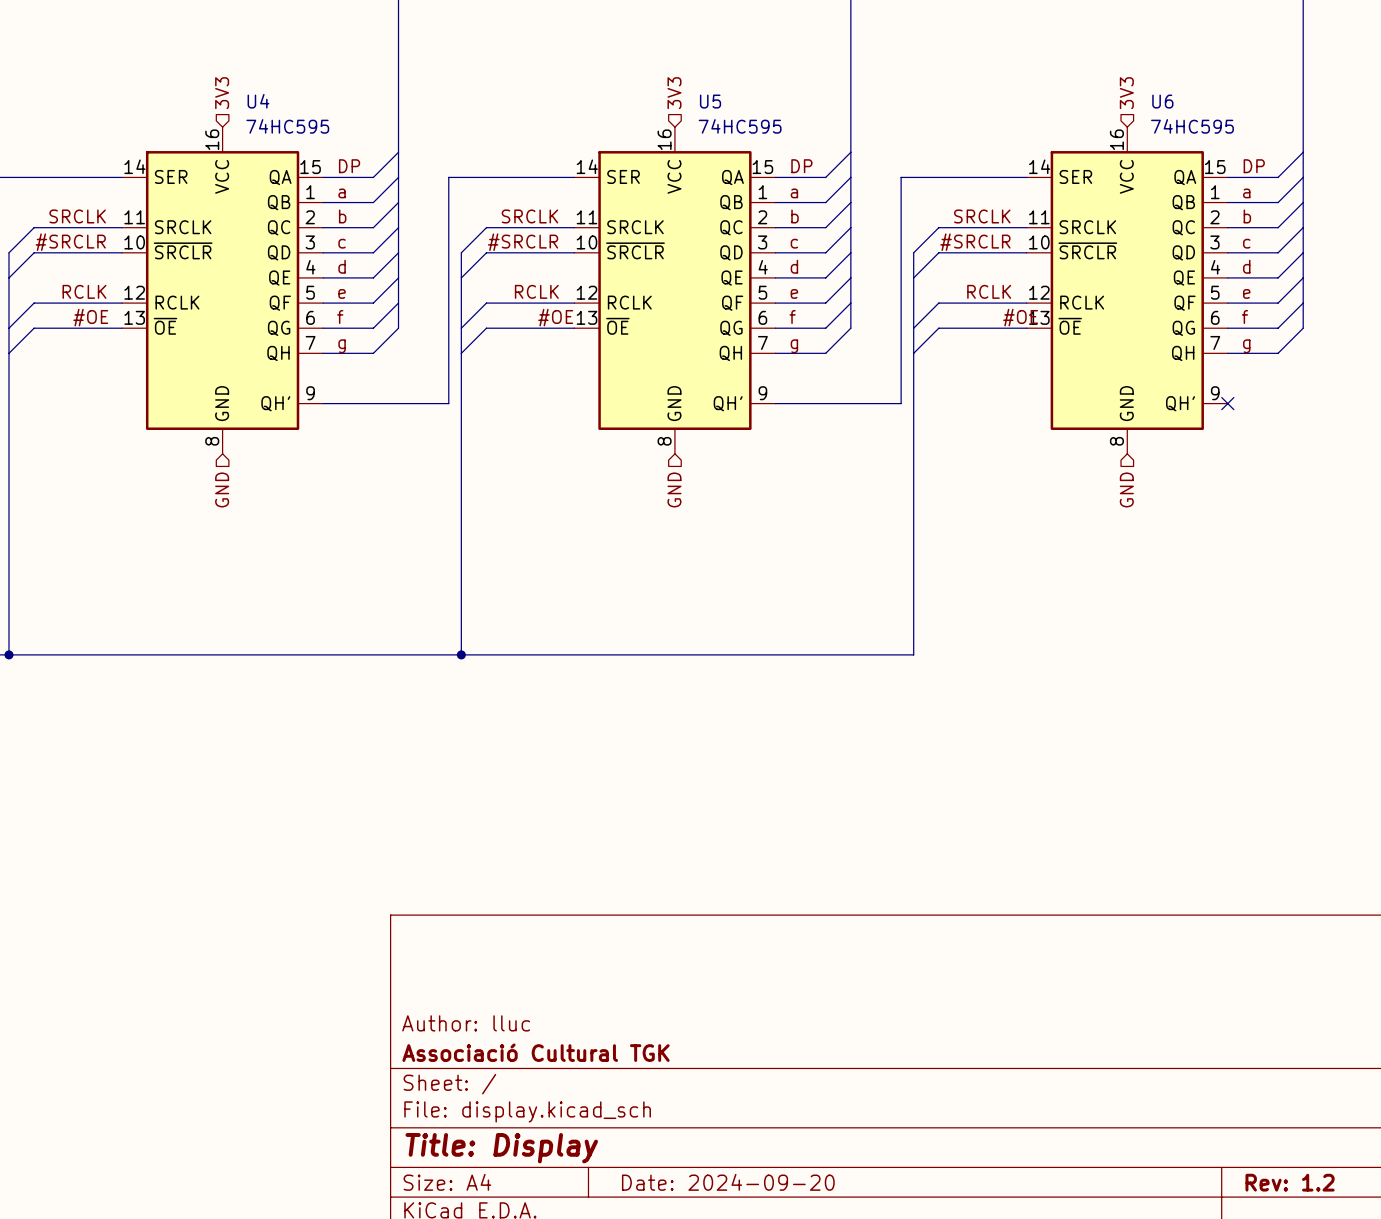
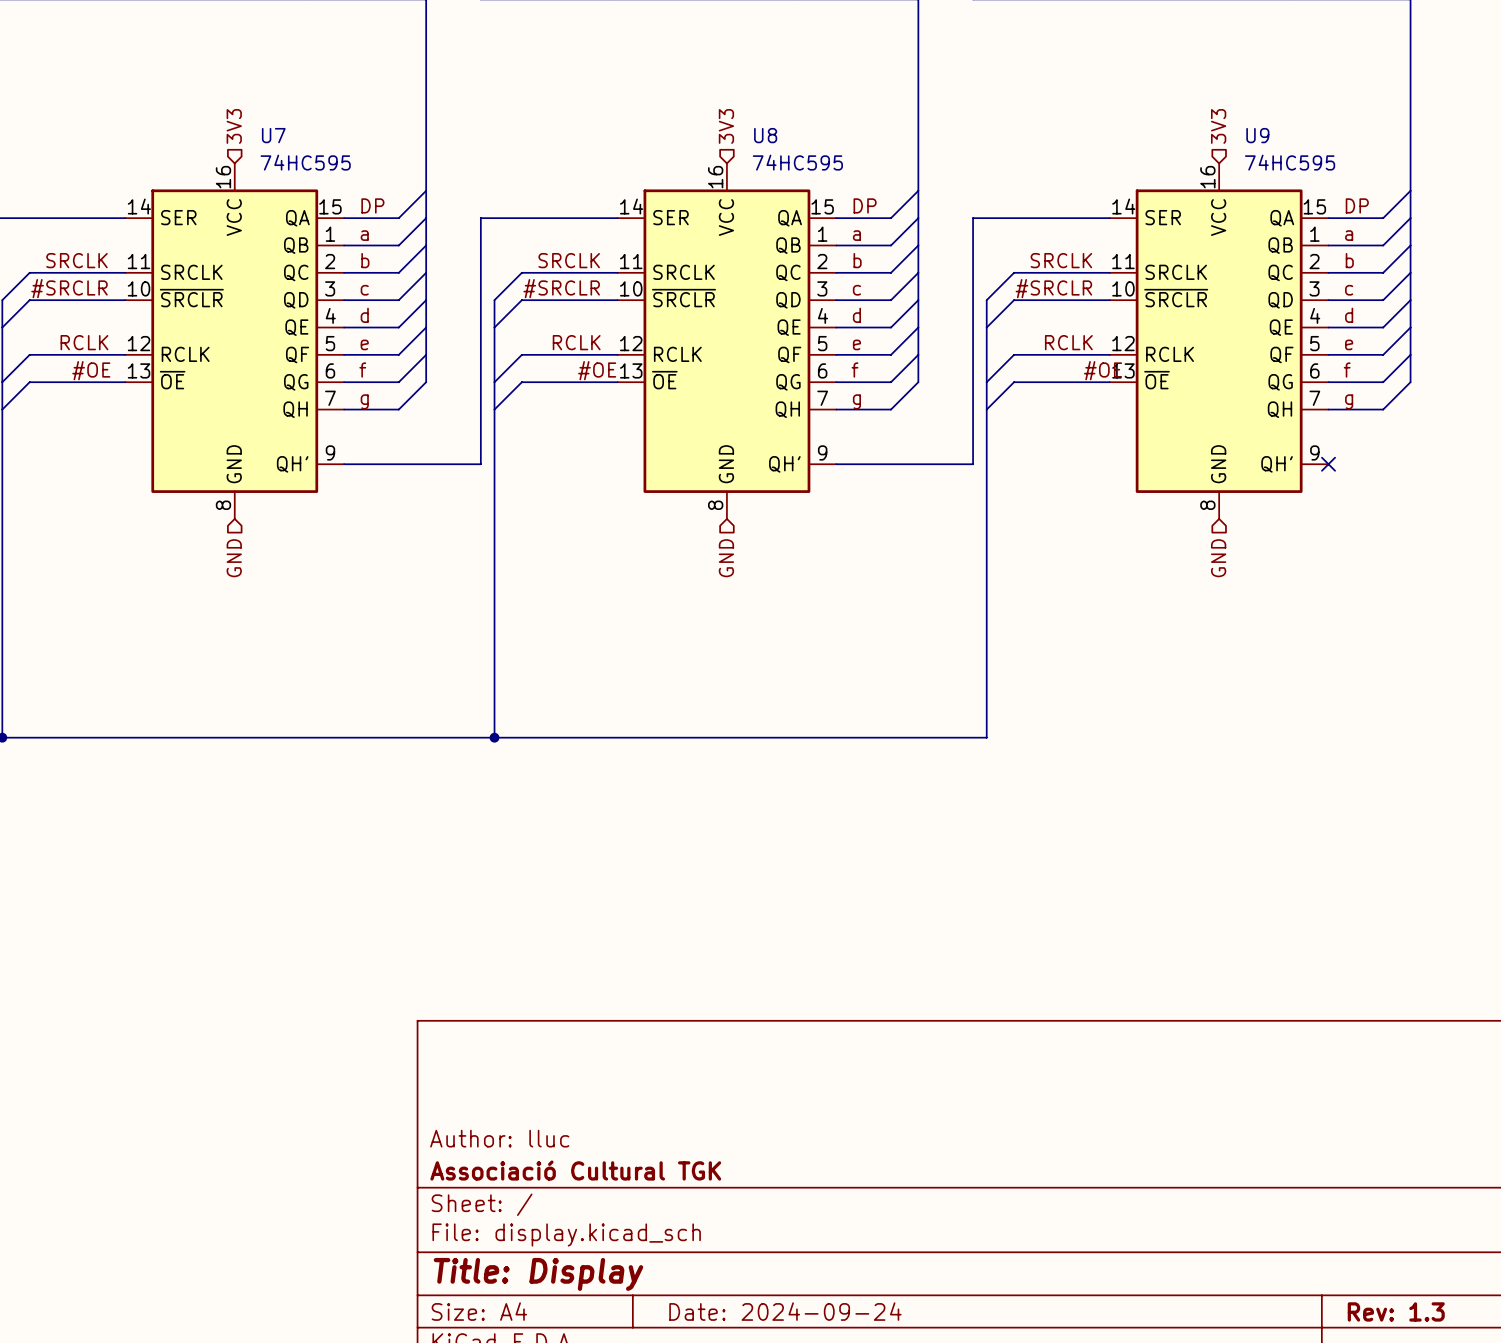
U4 name: U4 (258, 101) -> U7 (273, 135)
U5 name: U5 (710, 101) -> U8 (765, 135)
U6 name: U6 (1162, 101) -> U9 (1257, 135)
title block: Date: 2024-09-20 (728, 1182) -> Date: 2024-09-24 (785, 1311)
title block: Rev: 1.2 (1290, 1182) -> Rev: 1.3 (1396, 1311)

